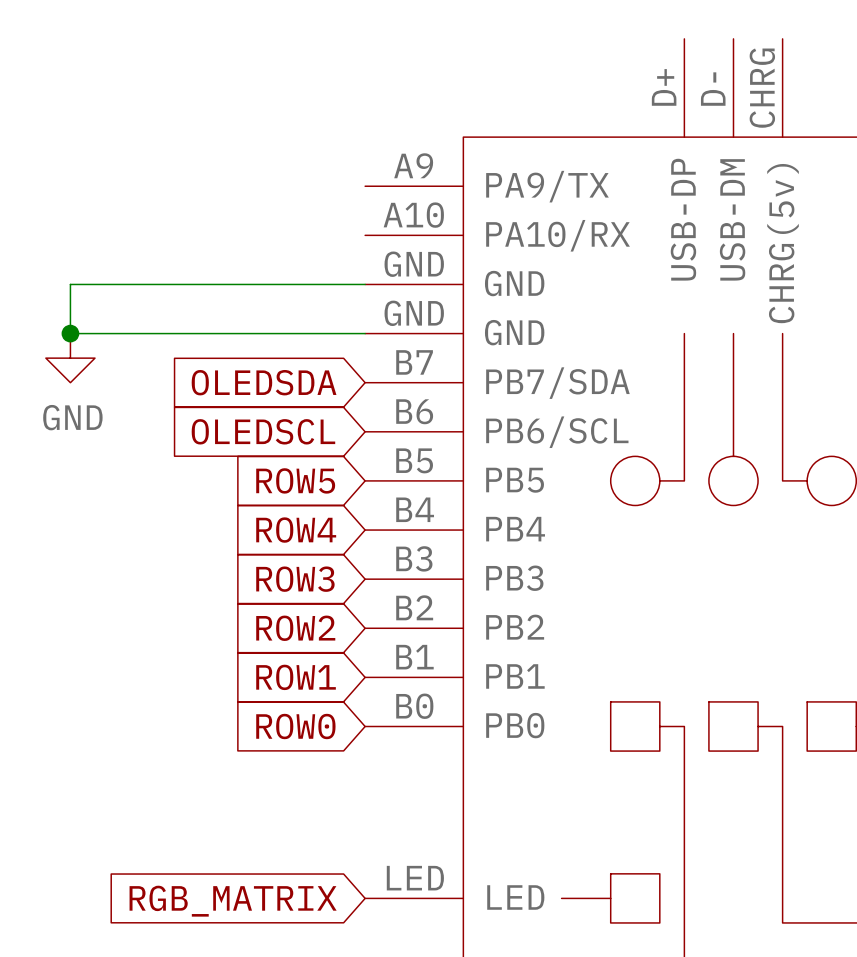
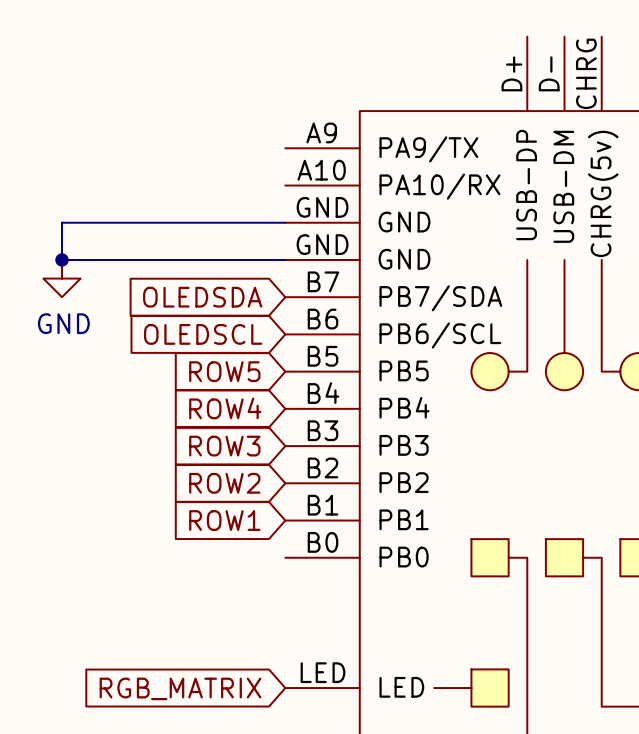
global label: ROW0 (295, 726) -> none

